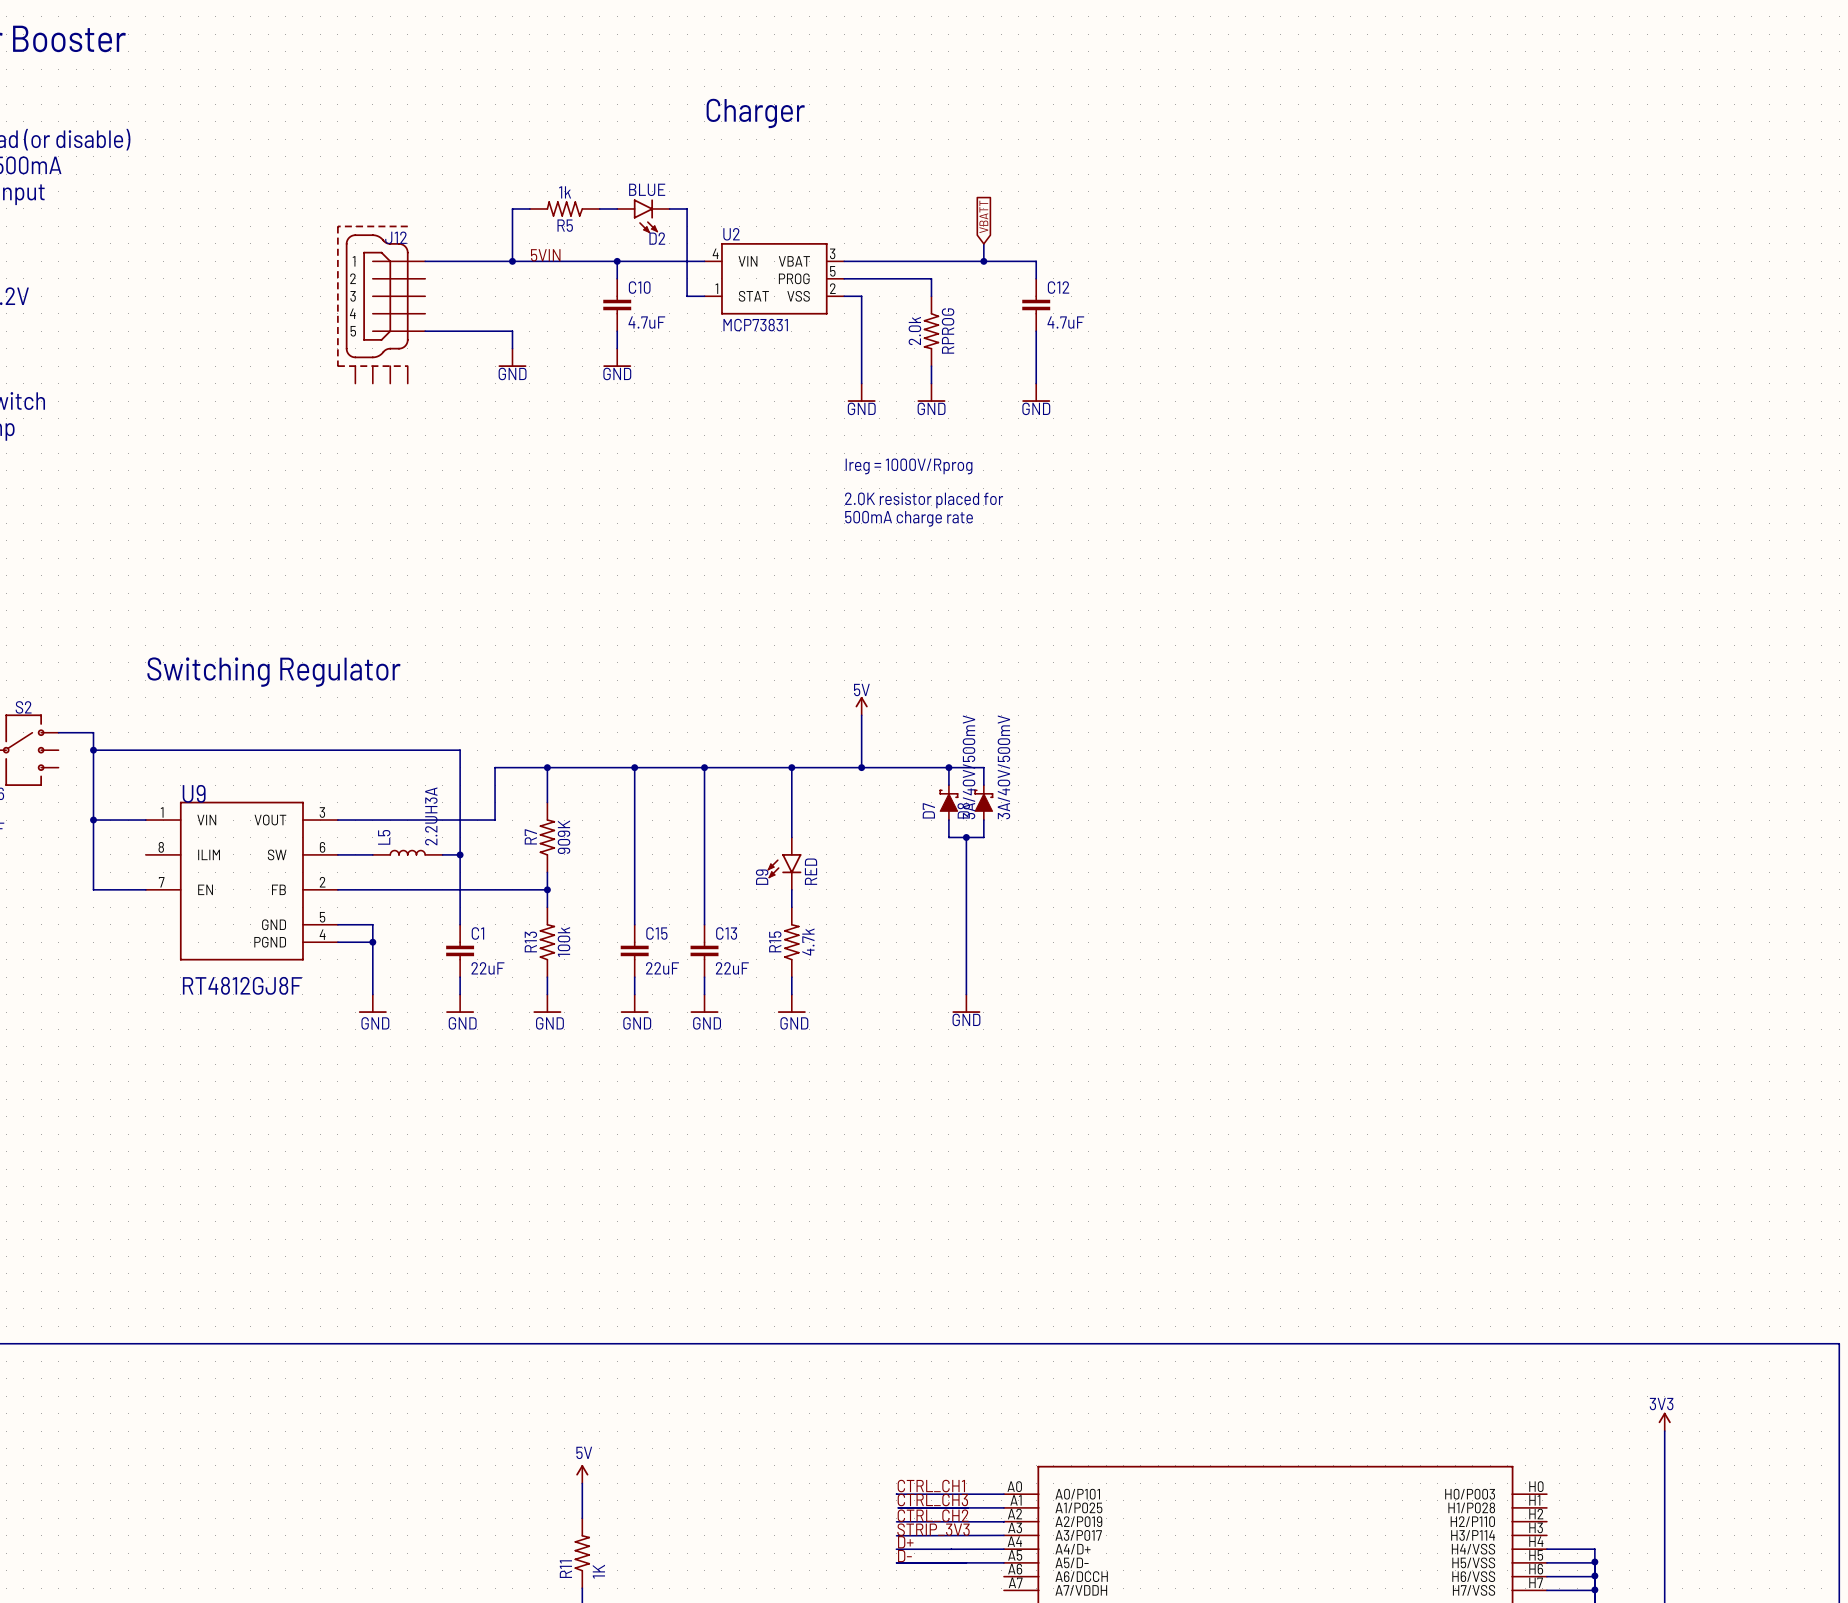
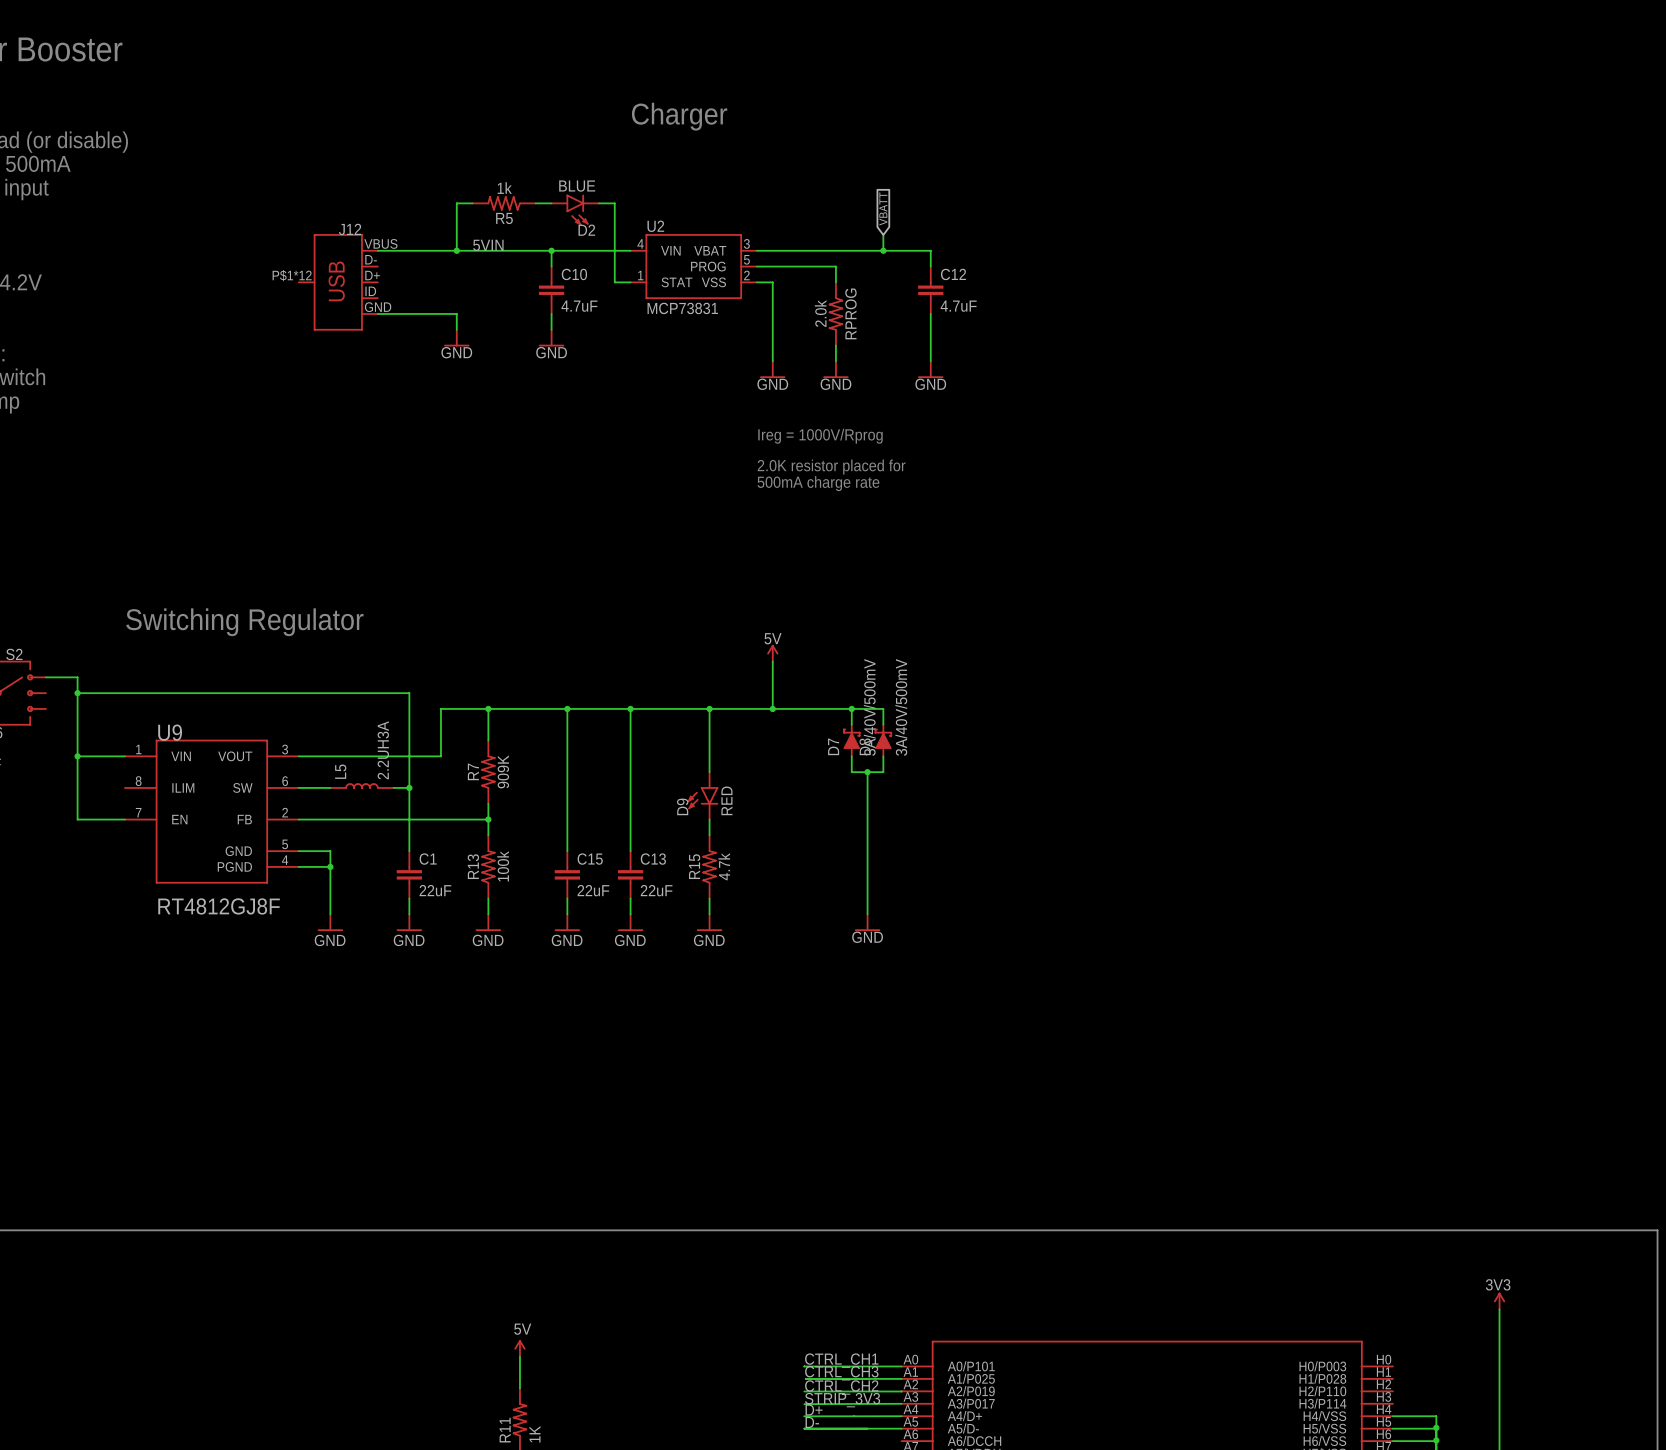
J12 symbol: [337, 225, 426, 384] -> [298, 234, 378, 331]

